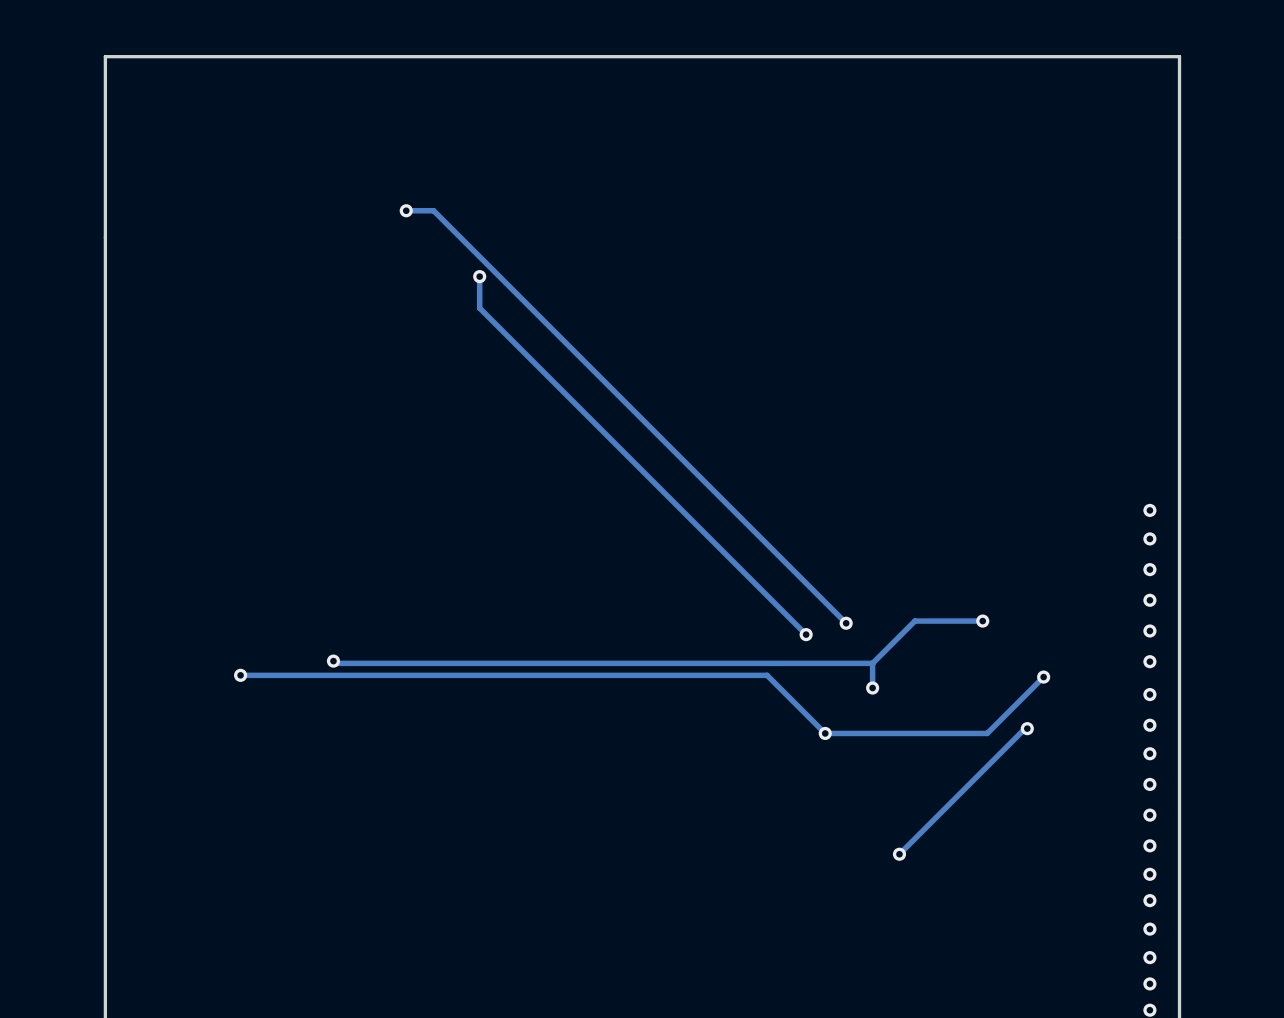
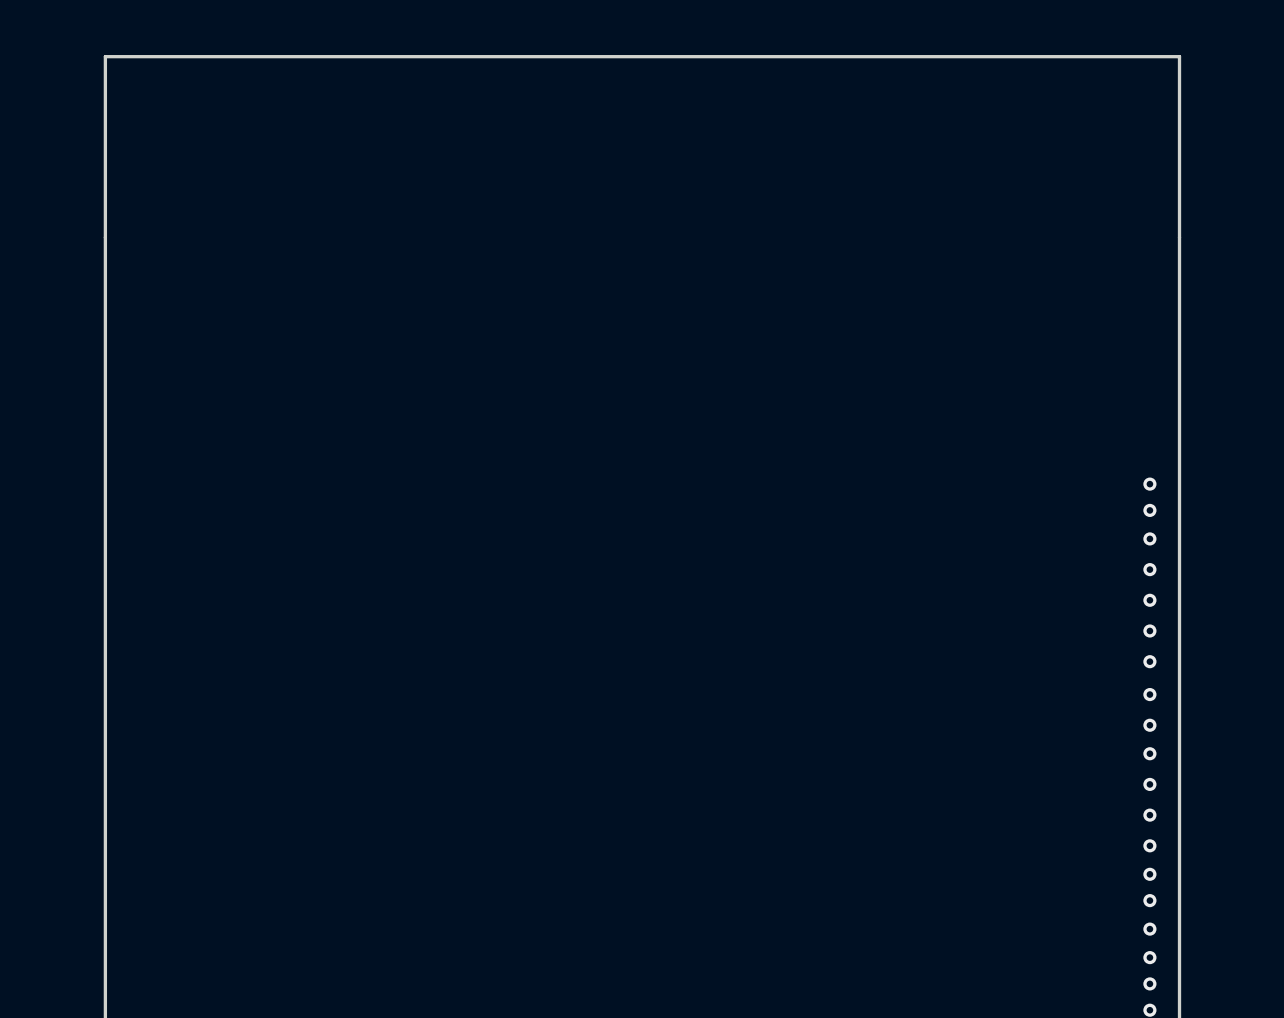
track: (406, 210) (433, 210) (846, 623) -> none
via: (406, 210) -> none
track: (479, 276) (479, 308) (806, 634) -> none
via: (479, 276) -> none
via: none -> (1149, 484)
track: (982, 621) (914, 621) (872, 663) -> none
via: (982, 621) -> none
via: (846, 623) -> none
via: (806, 634) -> none
track: (333, 661) (335, 663) (872, 663) -> none
via: (333, 661) -> none
track: (872, 663) (872, 688) -> none
track: (240, 675) (767, 675) (825, 733) (987, 733) (1043, 677) -> none
via: (240, 675) -> none
via: (1043, 677) -> none
via: (872, 688) -> none
track: (1027, 728) (1025, 728) (899, 854) -> none
via: (1027, 728) -> none
via: (825, 733) -> none
via: (899, 854) -> none

